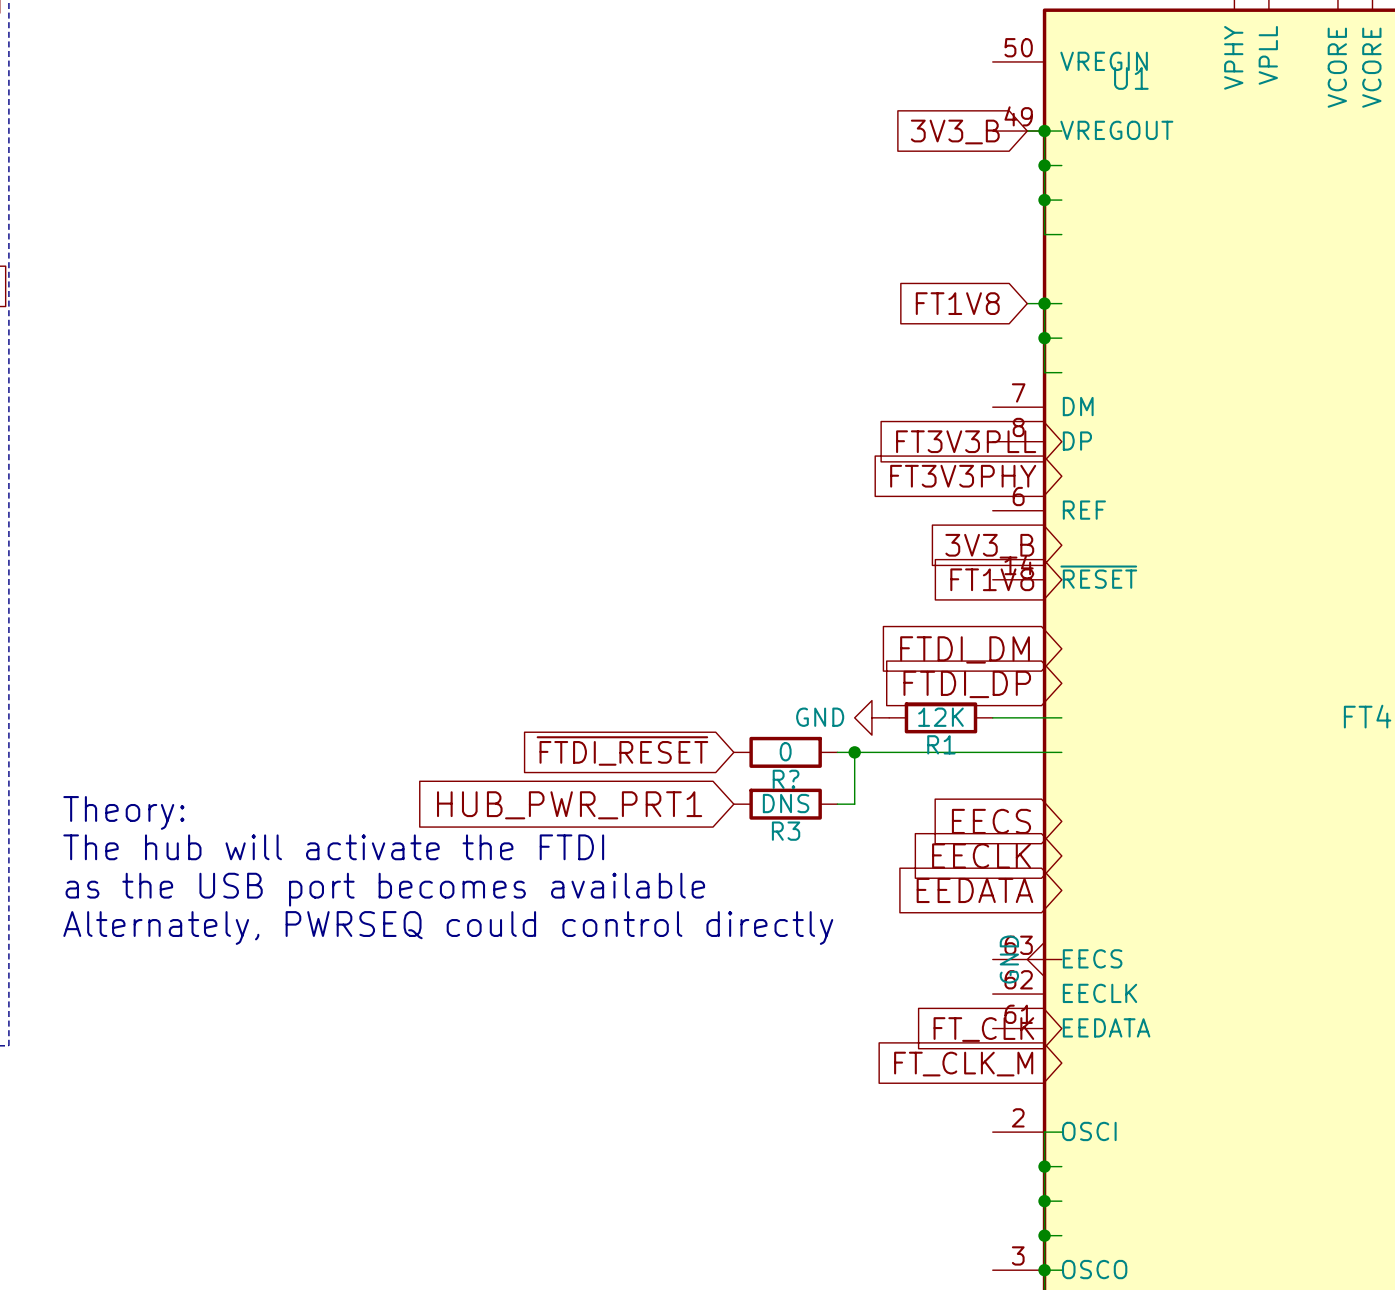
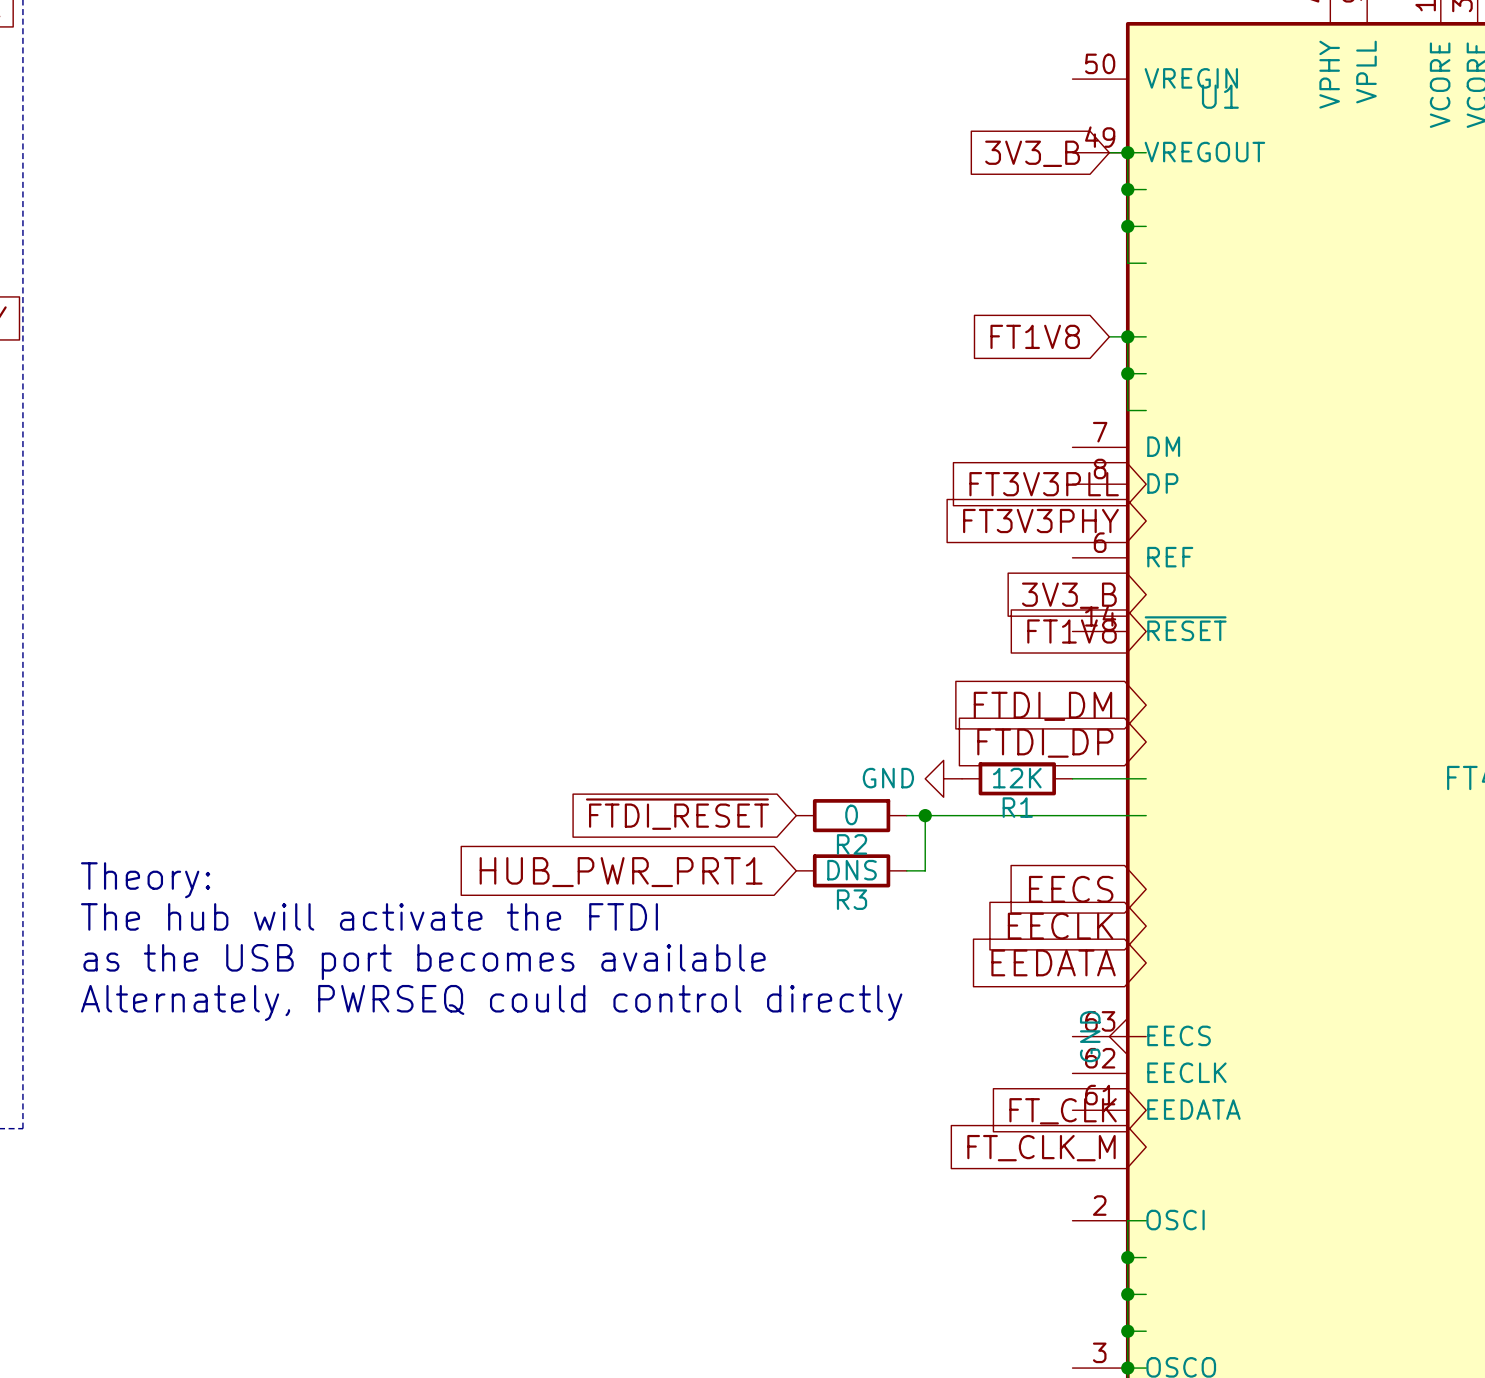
R? name: R? (786, 779) -> R2 (852, 844)

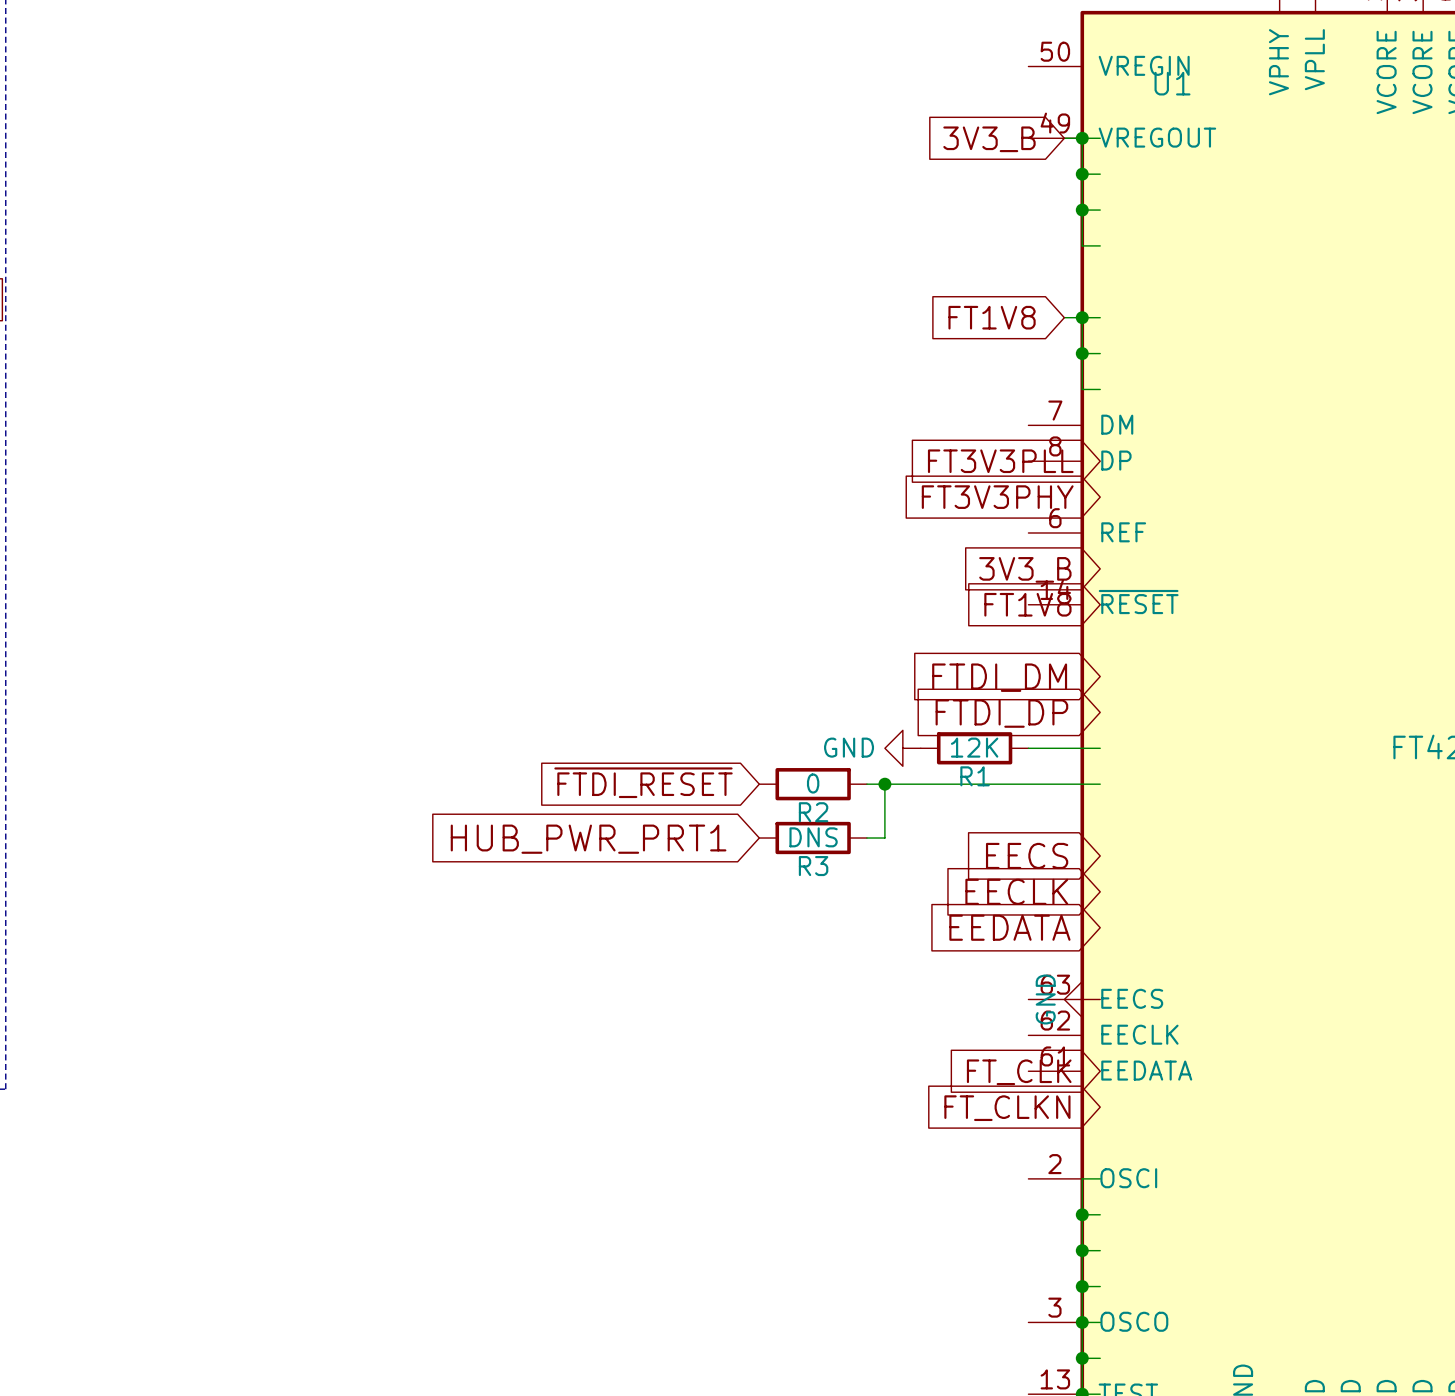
text: Theory: (145, 880) -> none
text: The hub will activate the FTDI (369, 916) -> none
text: as the USB port becomes available (424, 962) -> none
text: Alternately, PWRSEQ could control directly (491, 1002) -> none
global label: FT_CLK_M (1041, 1148) -> FT_CLKN (1007, 1108)

